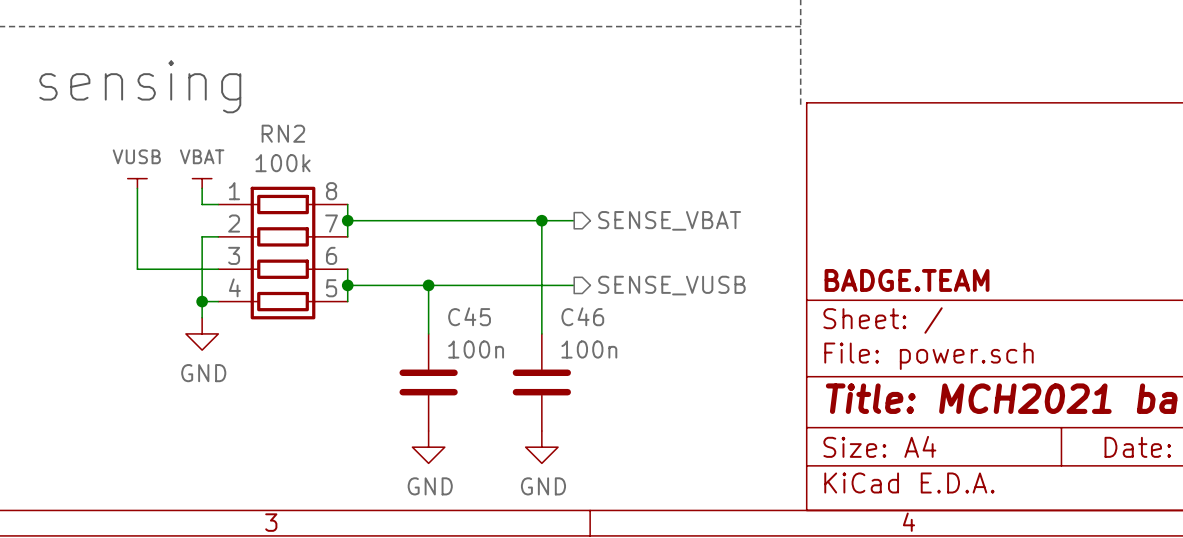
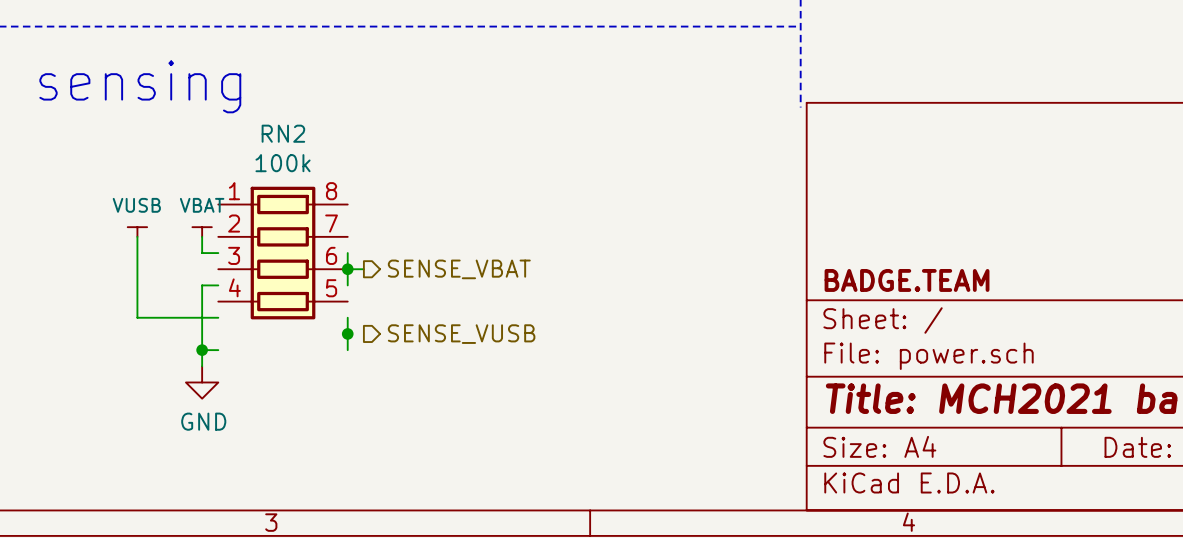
power symbol position: VUSB (137, 183) -> VUSB (137, 232)
power symbol position: VBAT (202, 183) -> VBAT (202, 232)
wire: (137, 188) (137, 236) -> (202, 317) (202, 366)
wire: (202, 188) (202, 204) (218, 204) -> (347, 253) (347, 269) (363, 269)
wire: (347, 204) (347, 236) -> (347, 317) (347, 350)
wire: (347, 220) (574, 220) -> none
junction: (347, 220) -> none
wire: (541, 220) (541, 333) -> none
junction: (541, 220) -> none
hierarchical label position: SENSE_VBAT (669, 220) -> SENSE_VBAT (459, 269)
wire: (202, 236) (218, 236) -> (202, 285) (218, 285)
wire: (202, 253) (202, 285) -> (202, 253) (218, 253)
wire: (137, 269) (218, 269) -> (137, 269) (137, 317) (218, 317)
junction position: (347, 285) -> (347, 269)
wire: (428, 285) (428, 333) -> none
junction: (428, 285) -> none
wire: (574, 285) (347, 285) (347, 301) -> none
hierarchical label position: SENSE_VUSB (671, 285) -> SENSE_VUSB (461, 334)
wire: (202, 301) (218, 301) -> (202, 350) (218, 350)
junction position: (202, 301) -> (202, 350)
power symbol position: GND (202, 333) -> GND (202, 382)
junction: none -> (347, 333)
C45: 100n (428, 382) -> none
C46: 100n (541, 382) -> none
power symbol: GND (428, 447) -> none
power symbol: GND (541, 447) -> none

